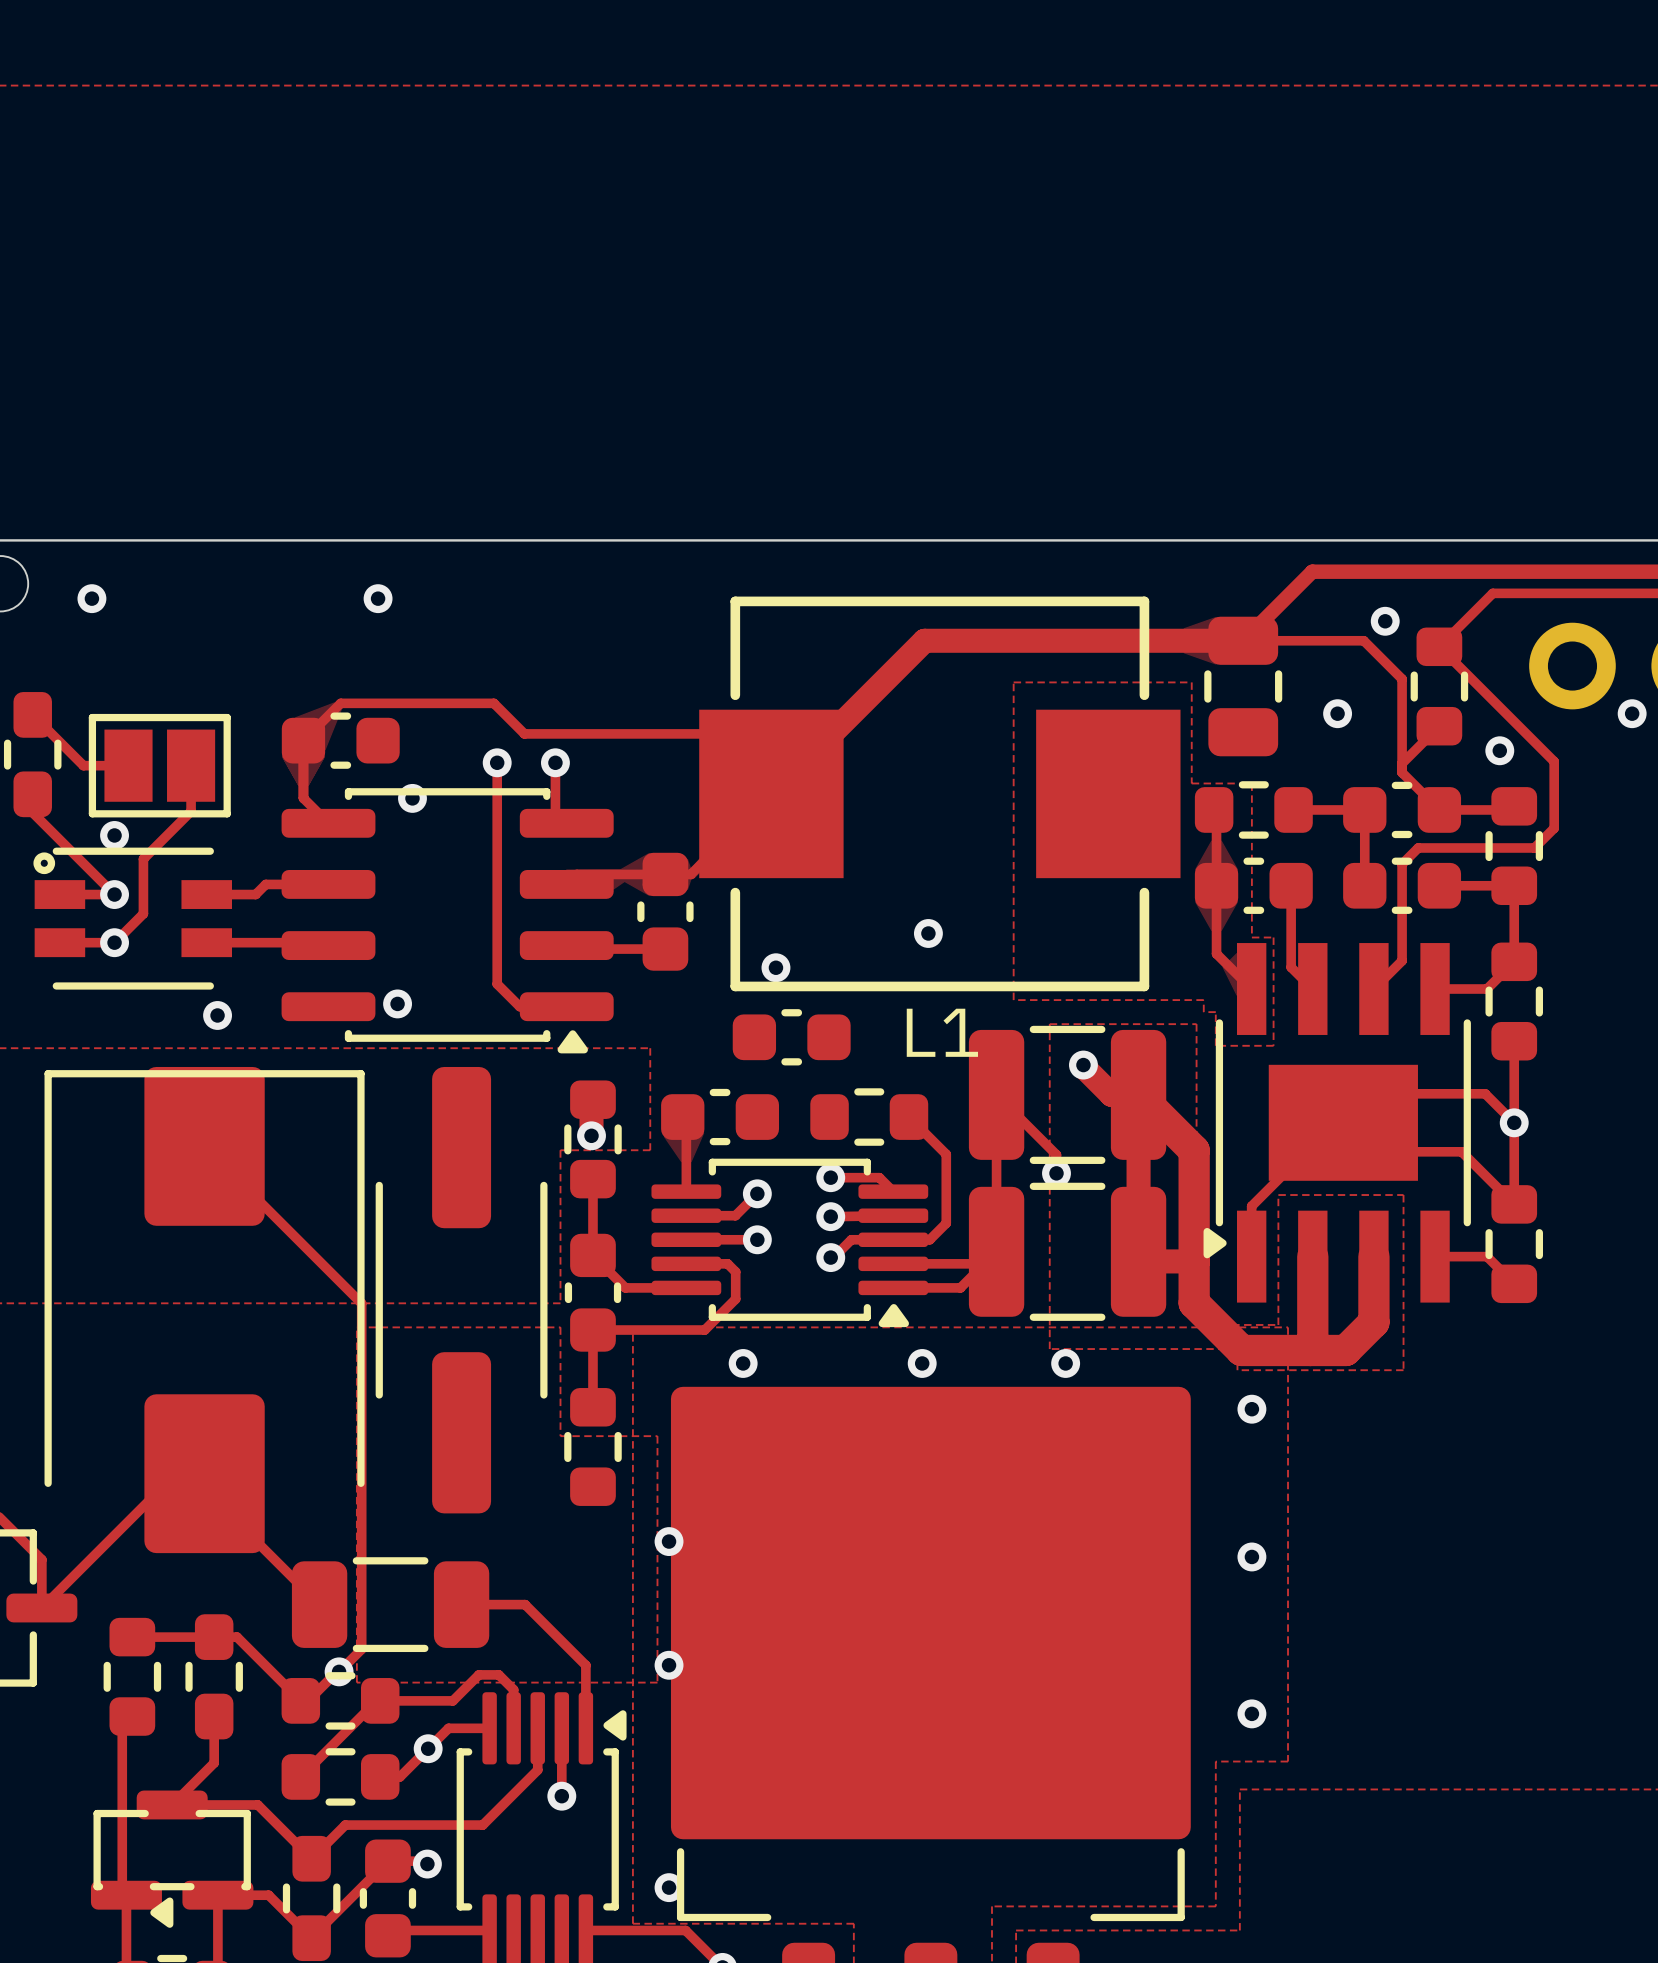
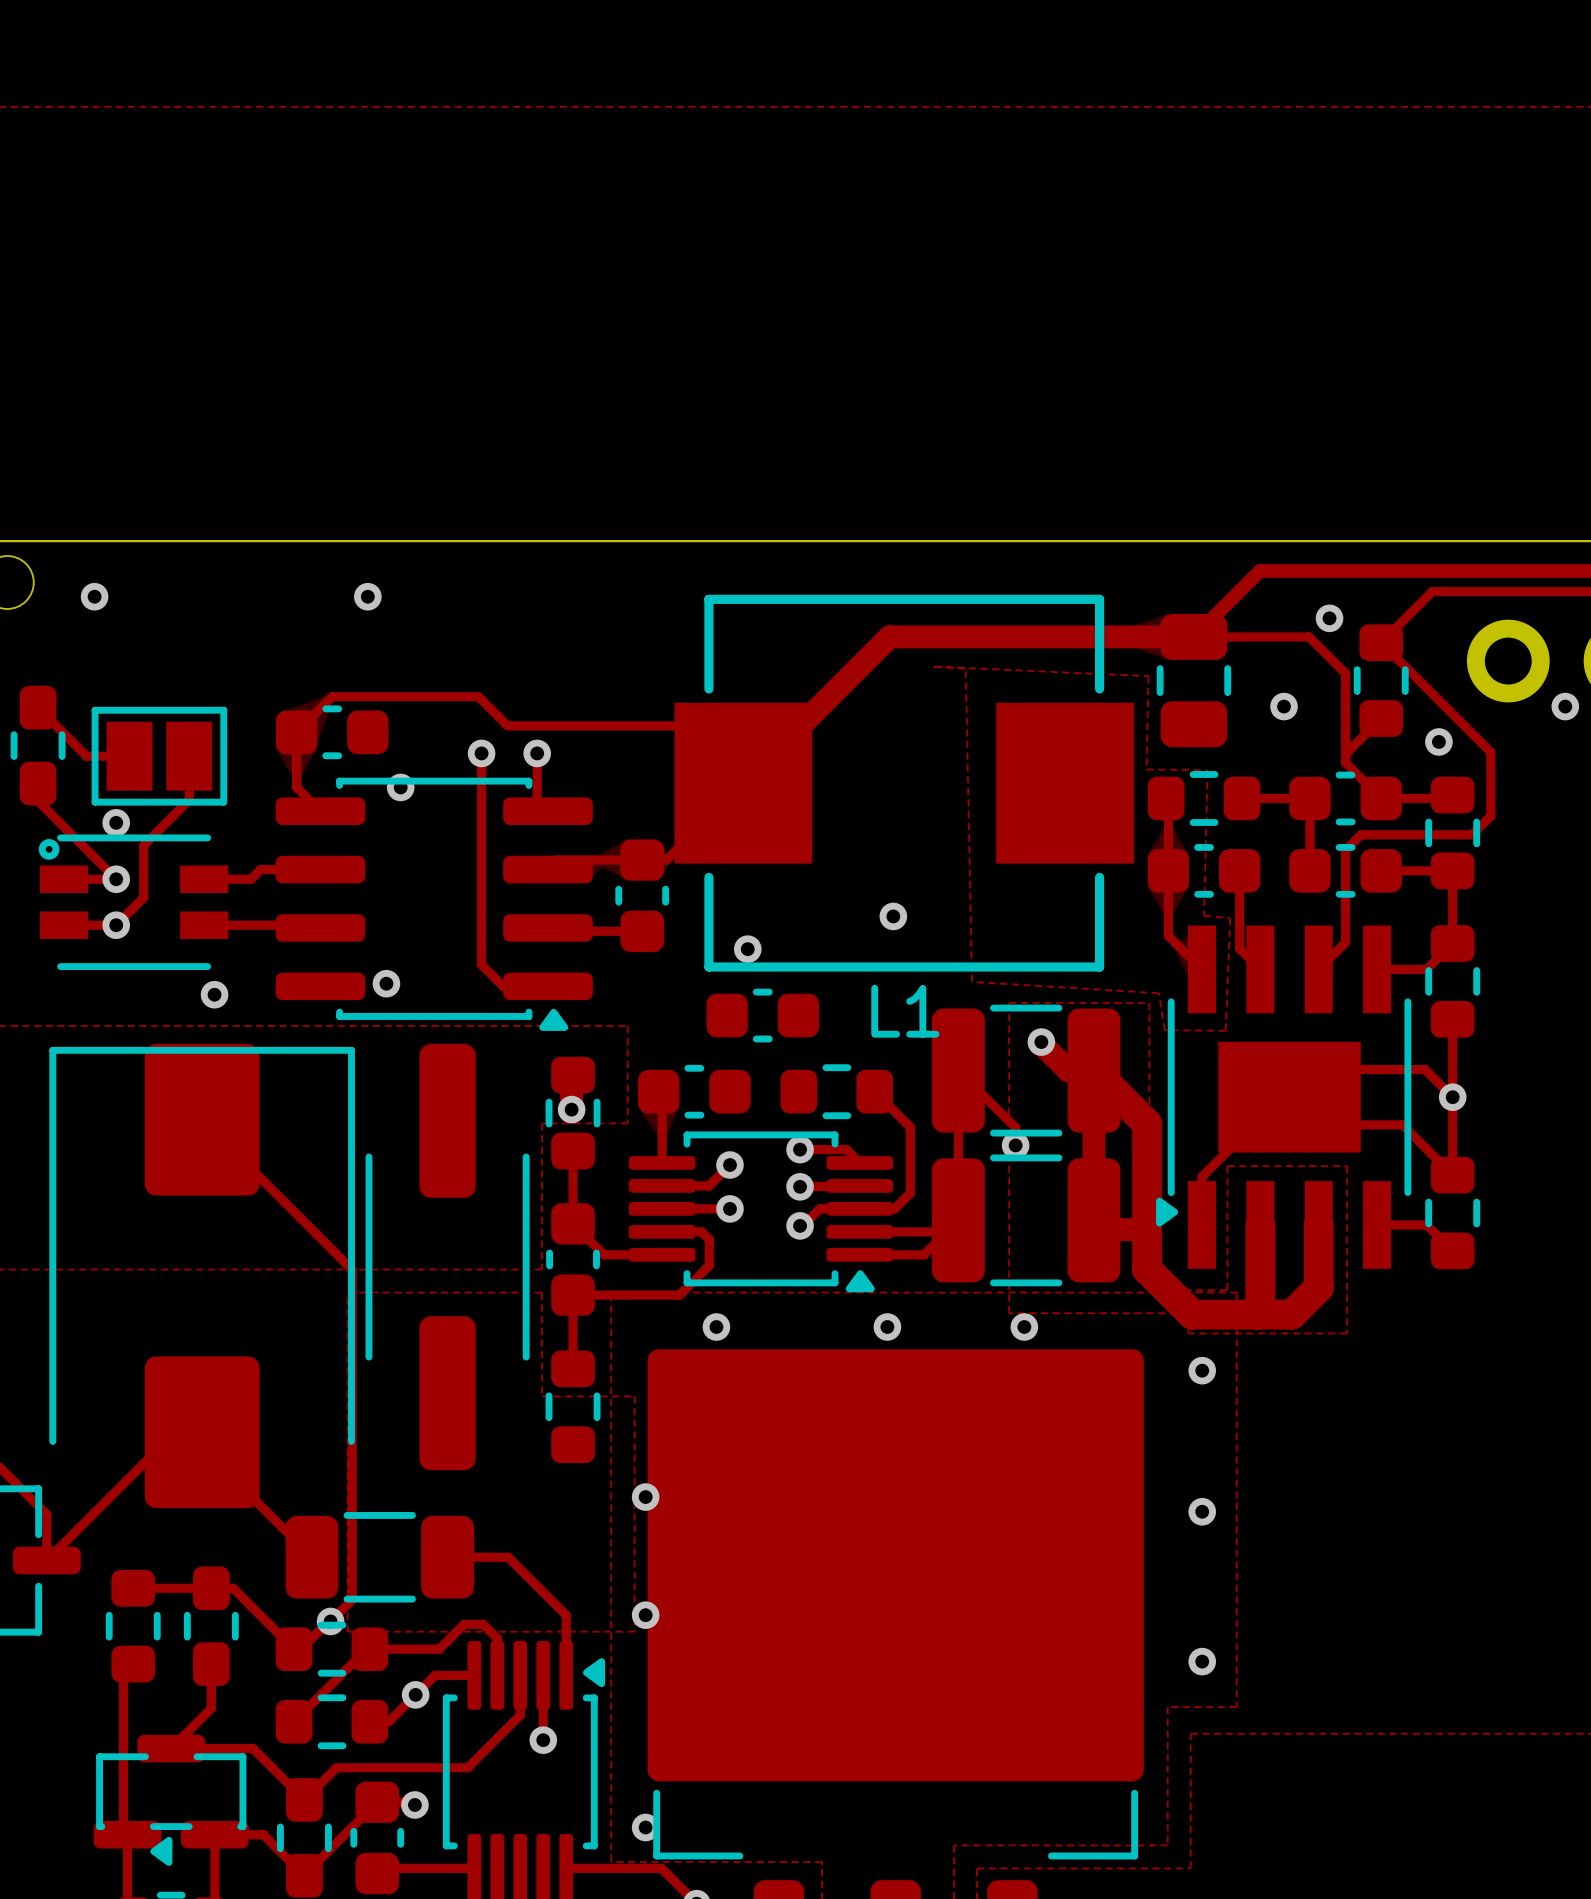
zone outline: (1013, 682) (1191, 682) (1191, 783) (1251, 783) (1251, 937) (1273, 937) (1273, 1045) (1215, 1045) (1215, 1012) (1203, 1012) (1203, 1000) (1013, 1000) (1013, 682) -> (933, 666) (965, 668) (972, 981) (1158, 993) (1164, 1030) (1225, 1030) (1230, 918) (1204, 915) (1207, 770) (1146, 769) (1148, 676) (933, 666)

